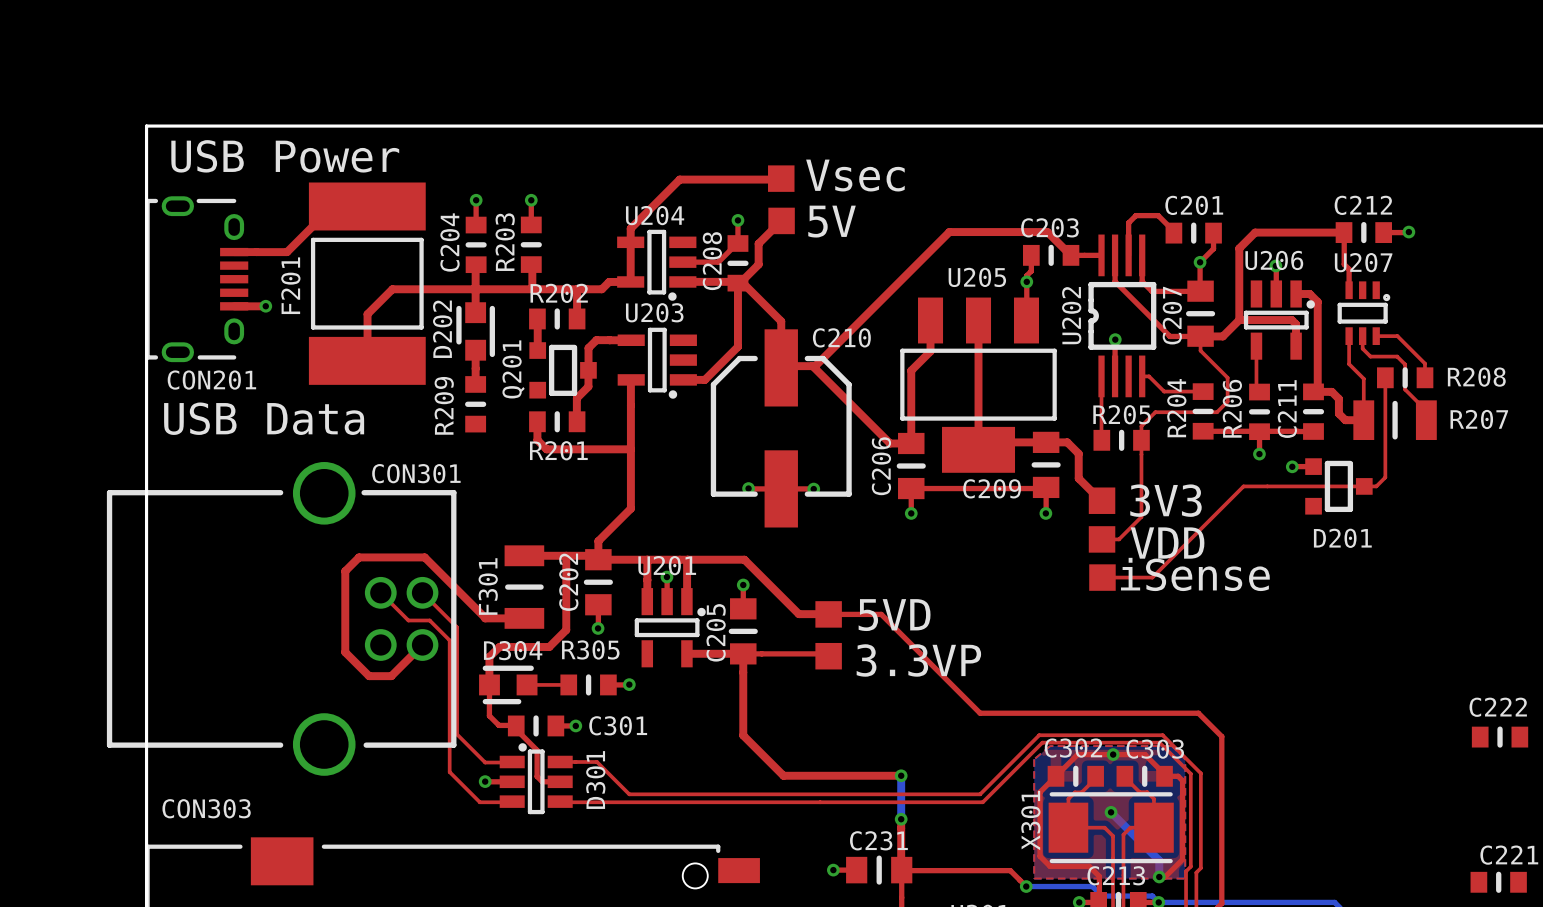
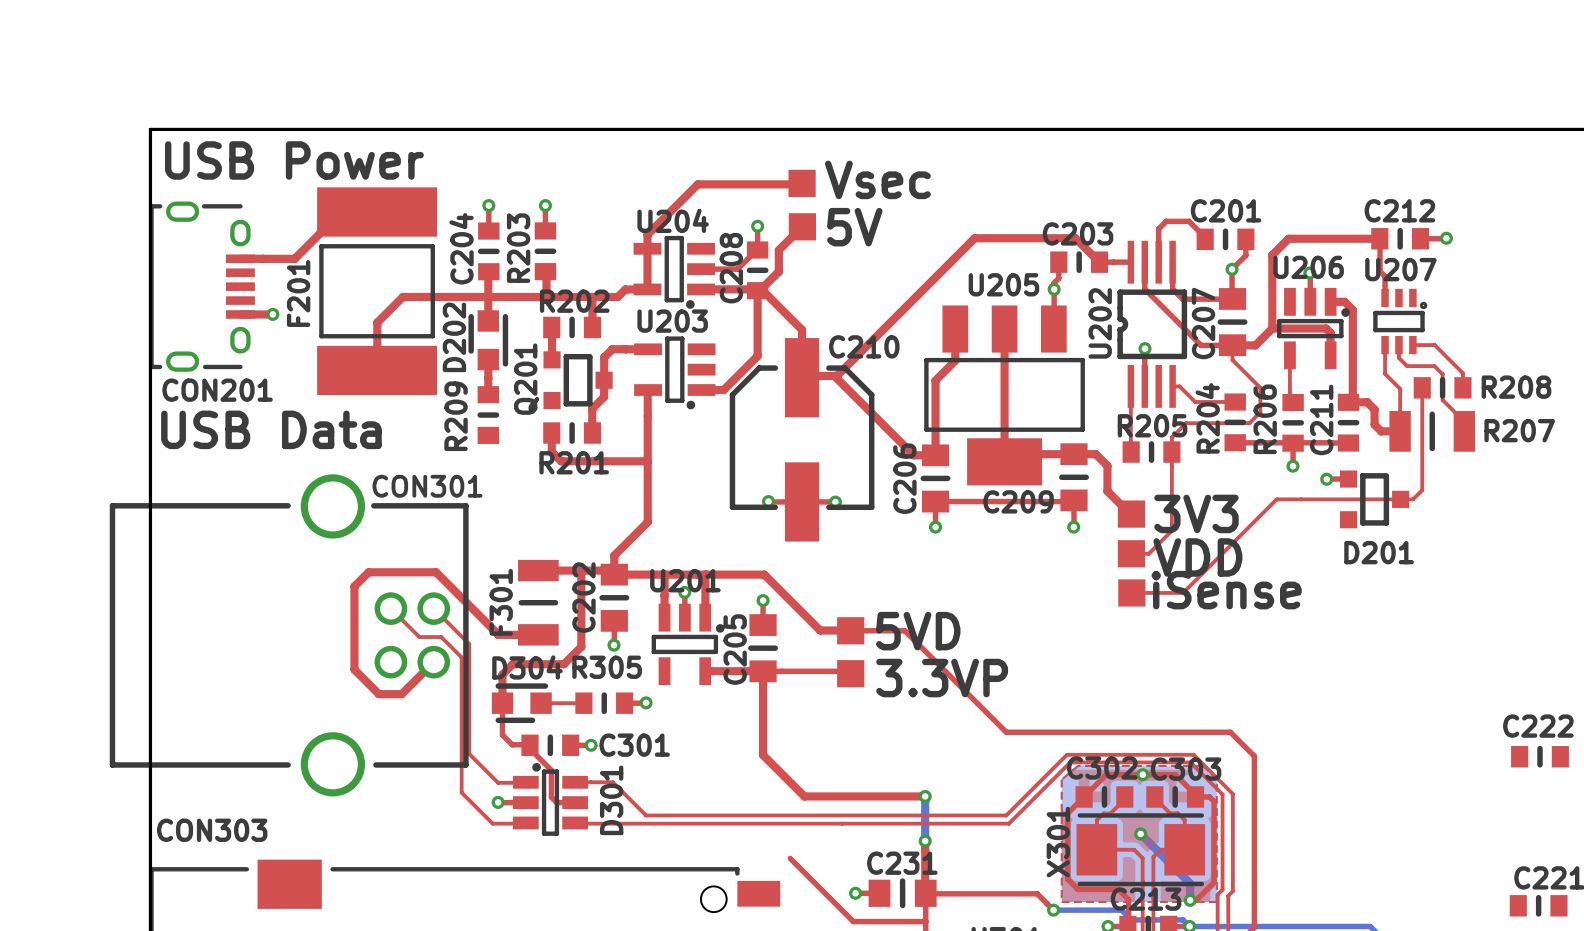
top track: none -> (790, 858) (853, 921) (925, 921)

